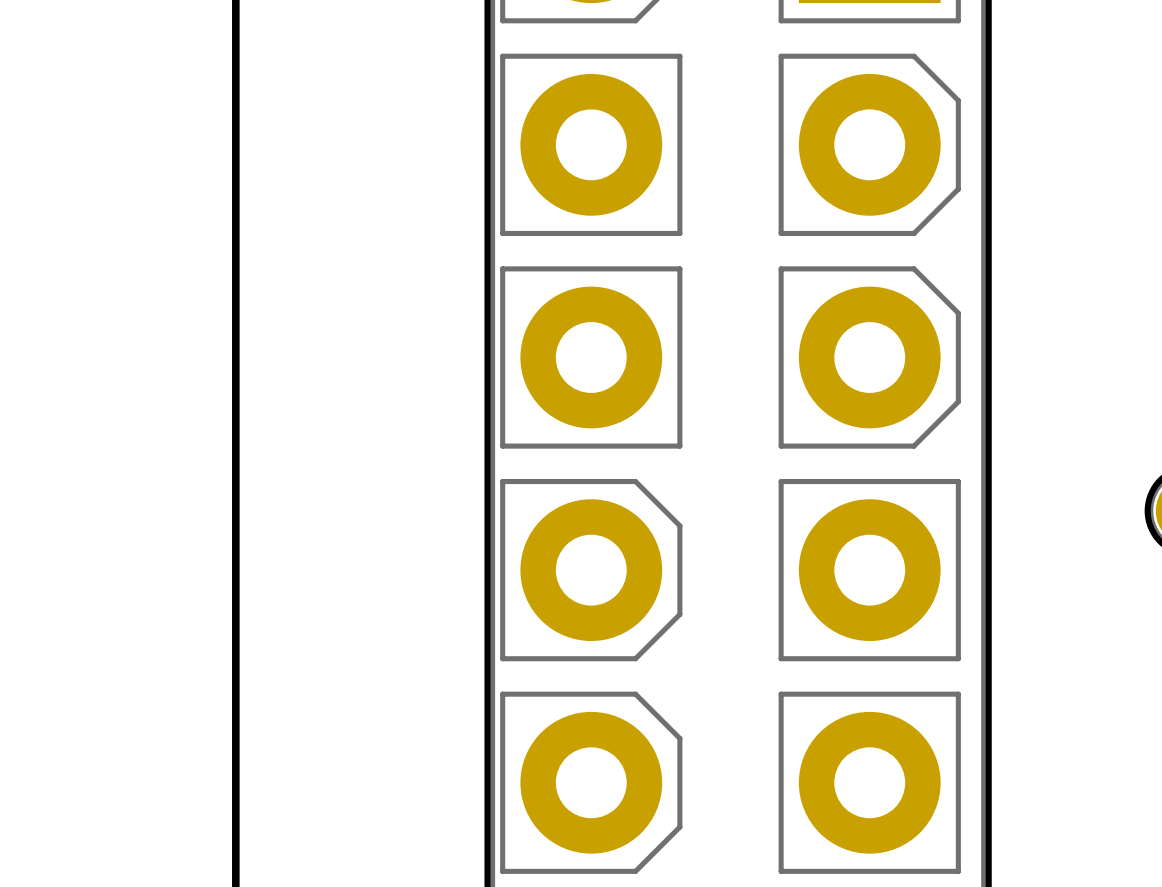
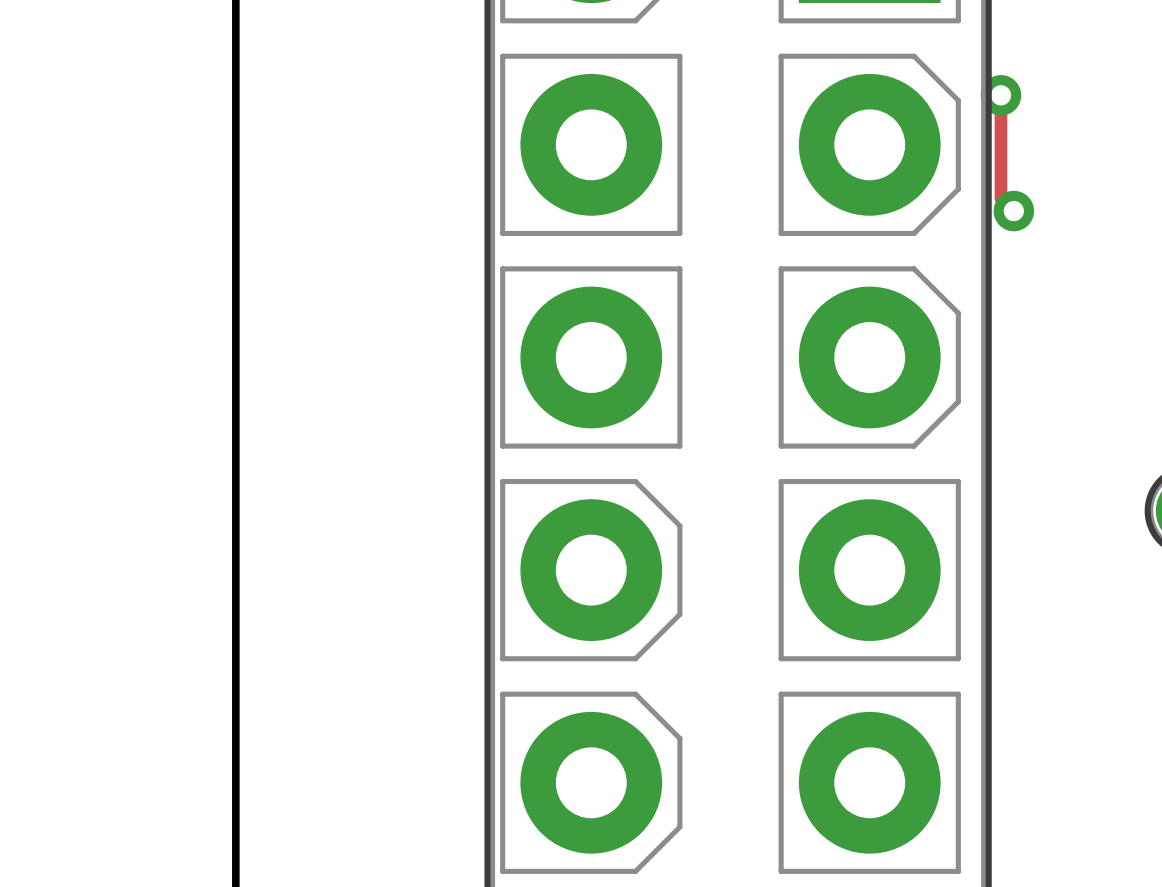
track: none -> (1000, 95) (1000, 198) (1013, 211)
via: none -> (1000, 95)
via: none -> (1013, 211)

